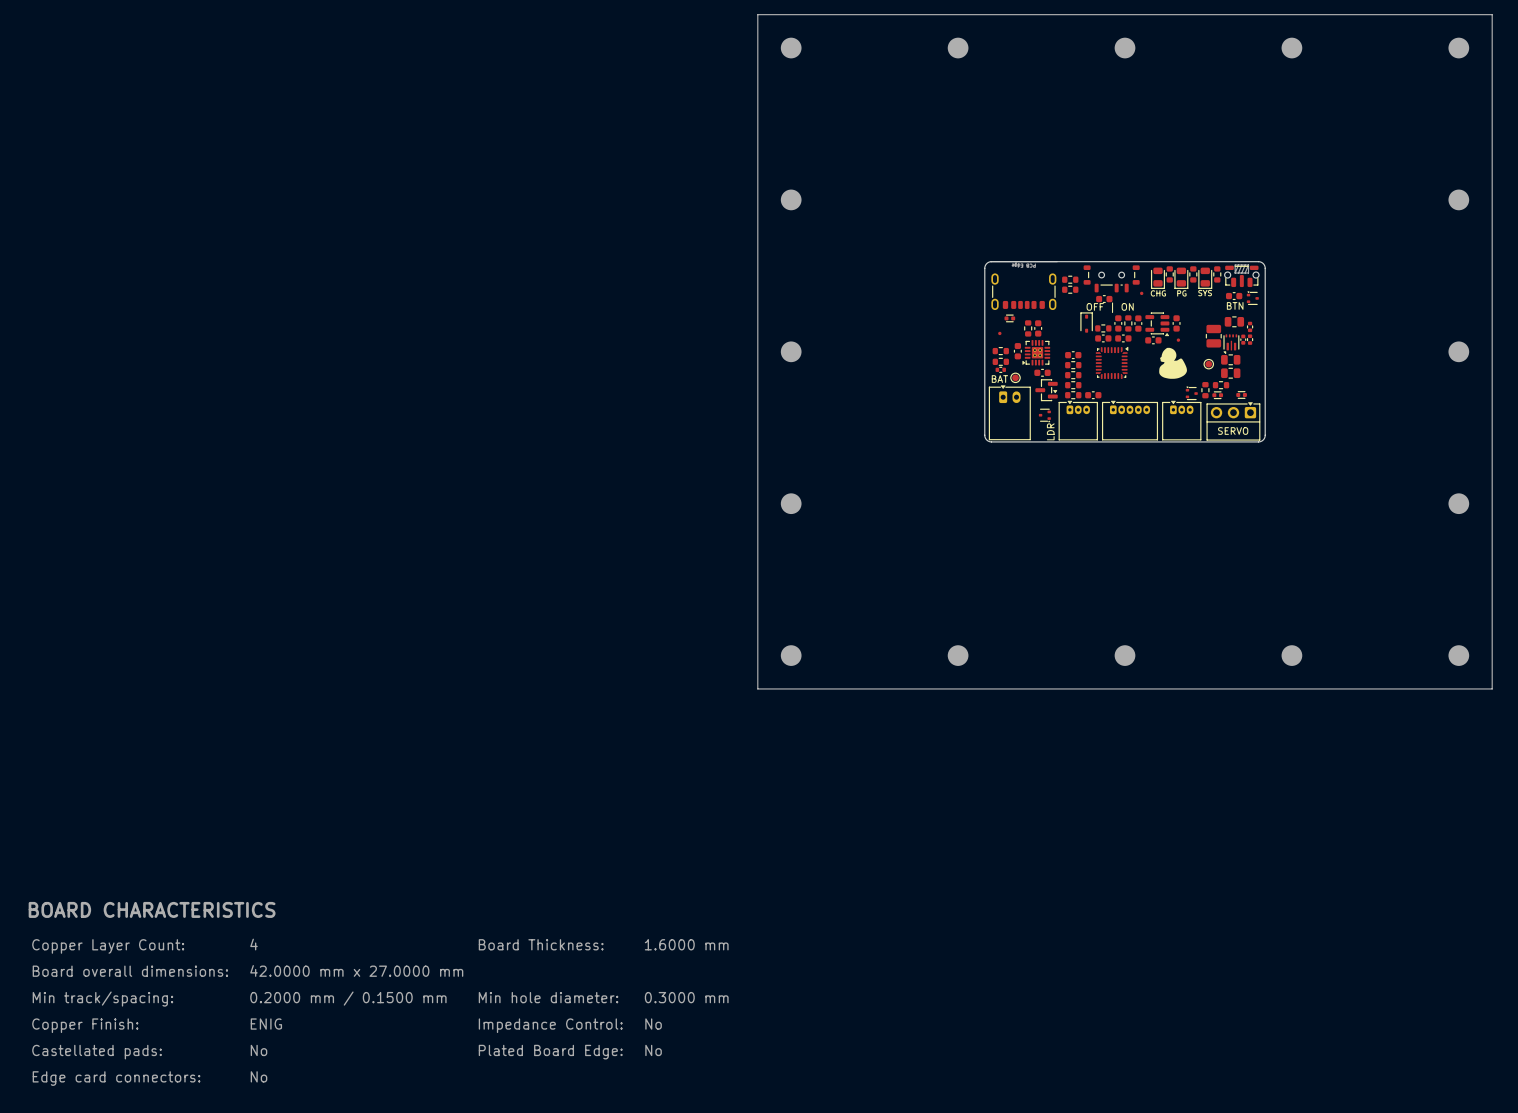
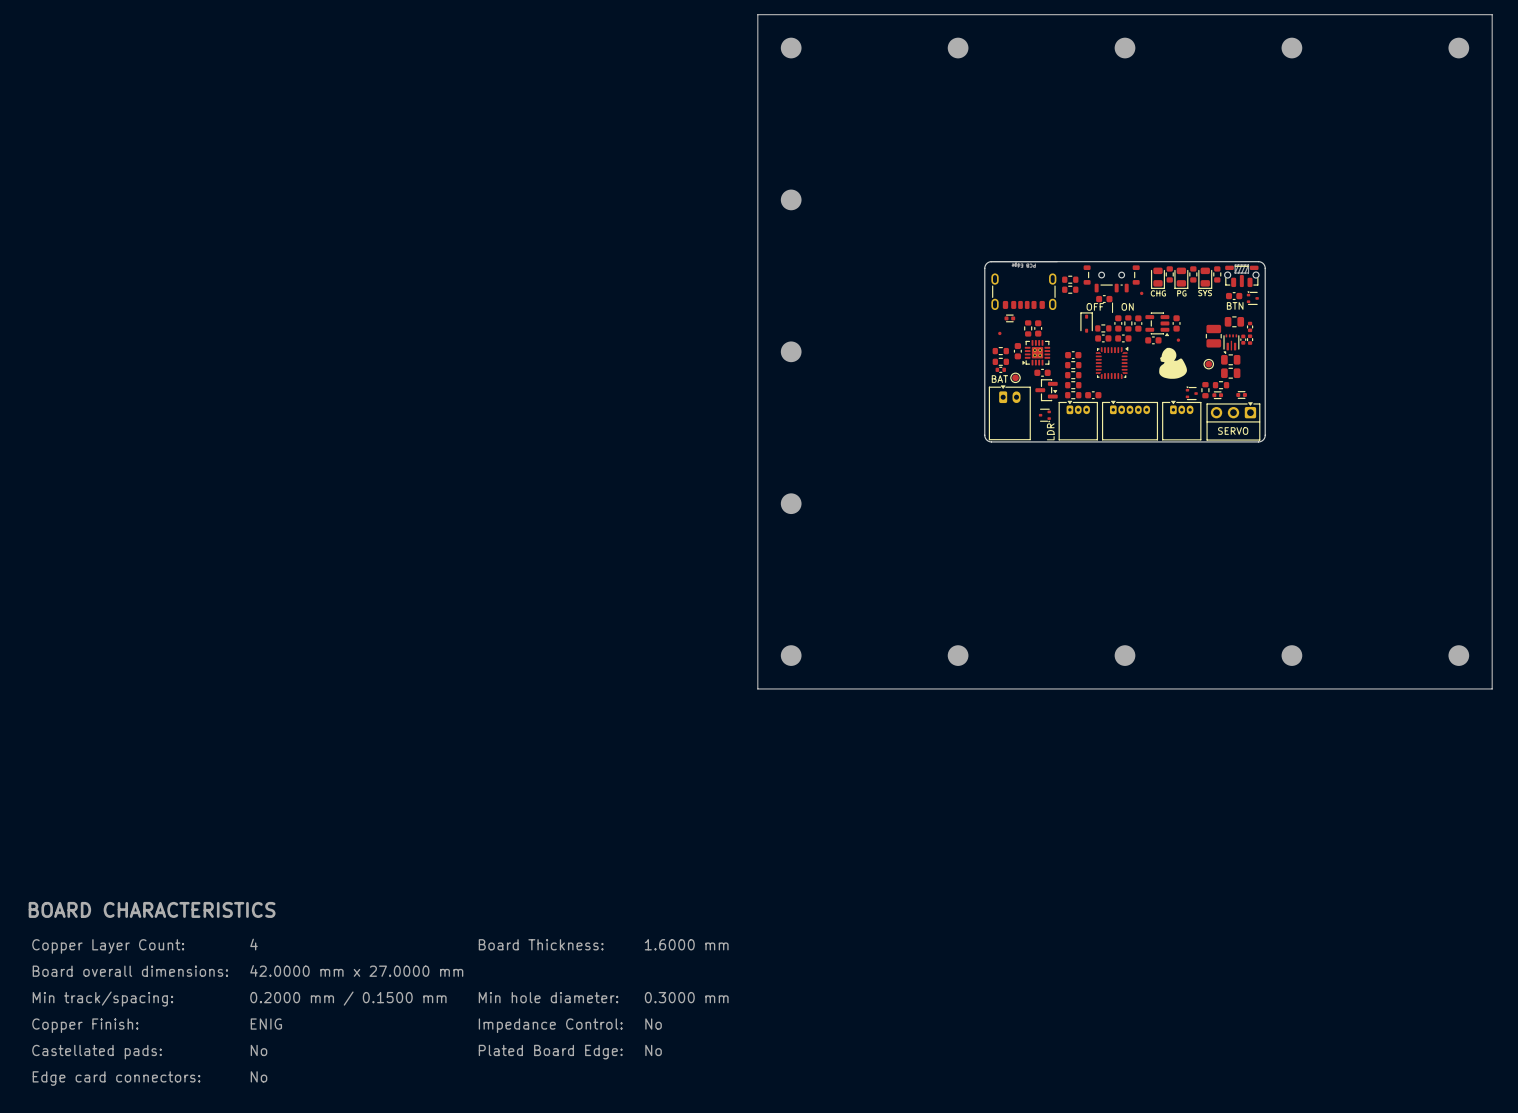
drawing: [1448, 189, 1470, 211] -> none
drawing: [1448, 341, 1470, 363] -> none
drawing: [1448, 493, 1470, 515] -> none

